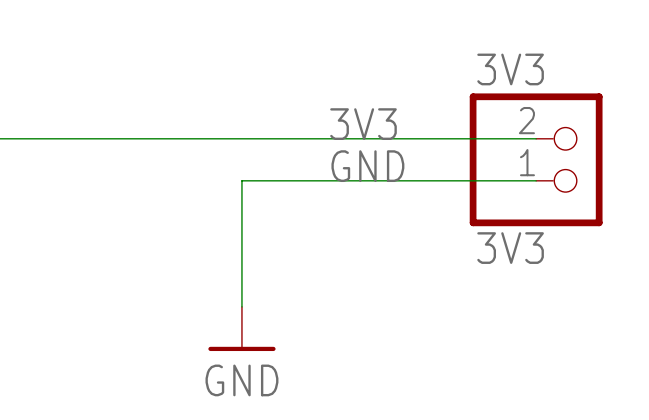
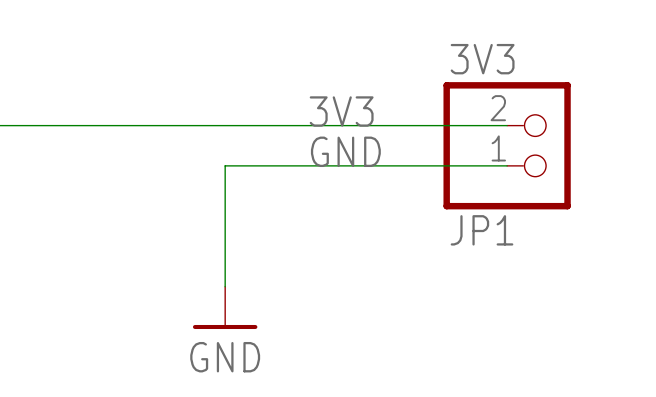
3V3 name: 3V3 (510, 248) -> JP1 (482, 230)

